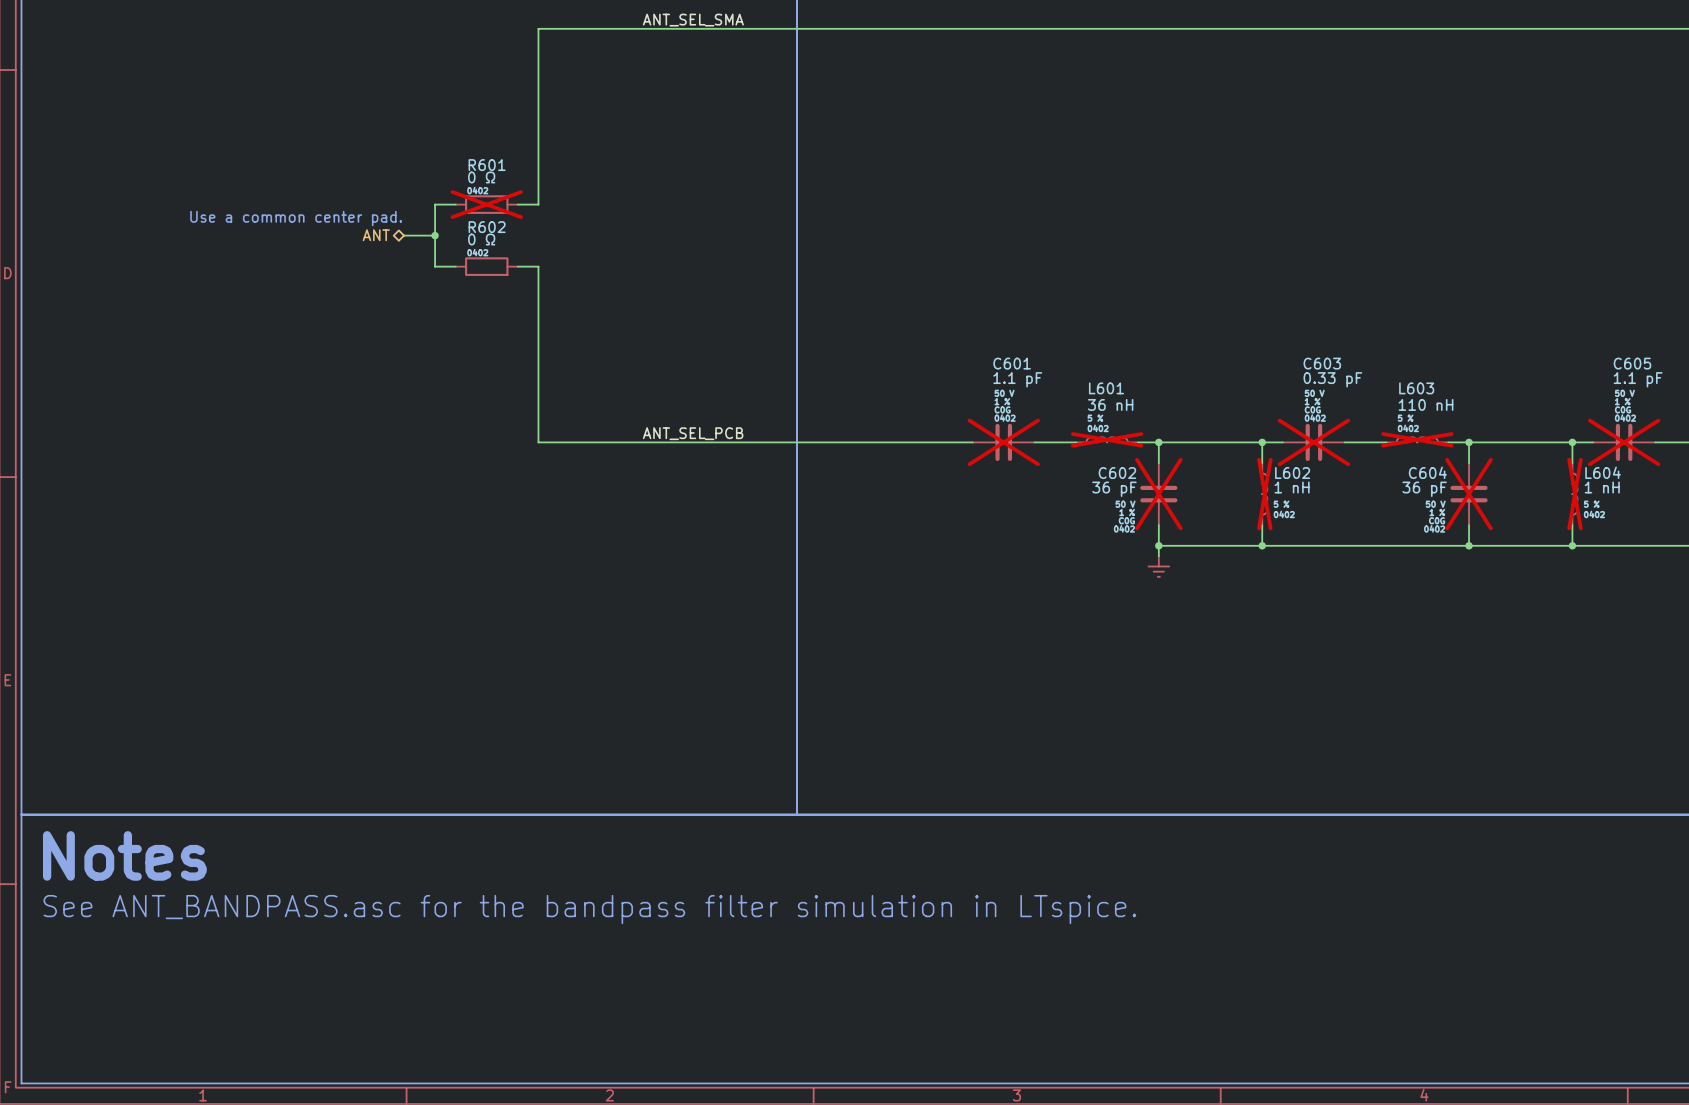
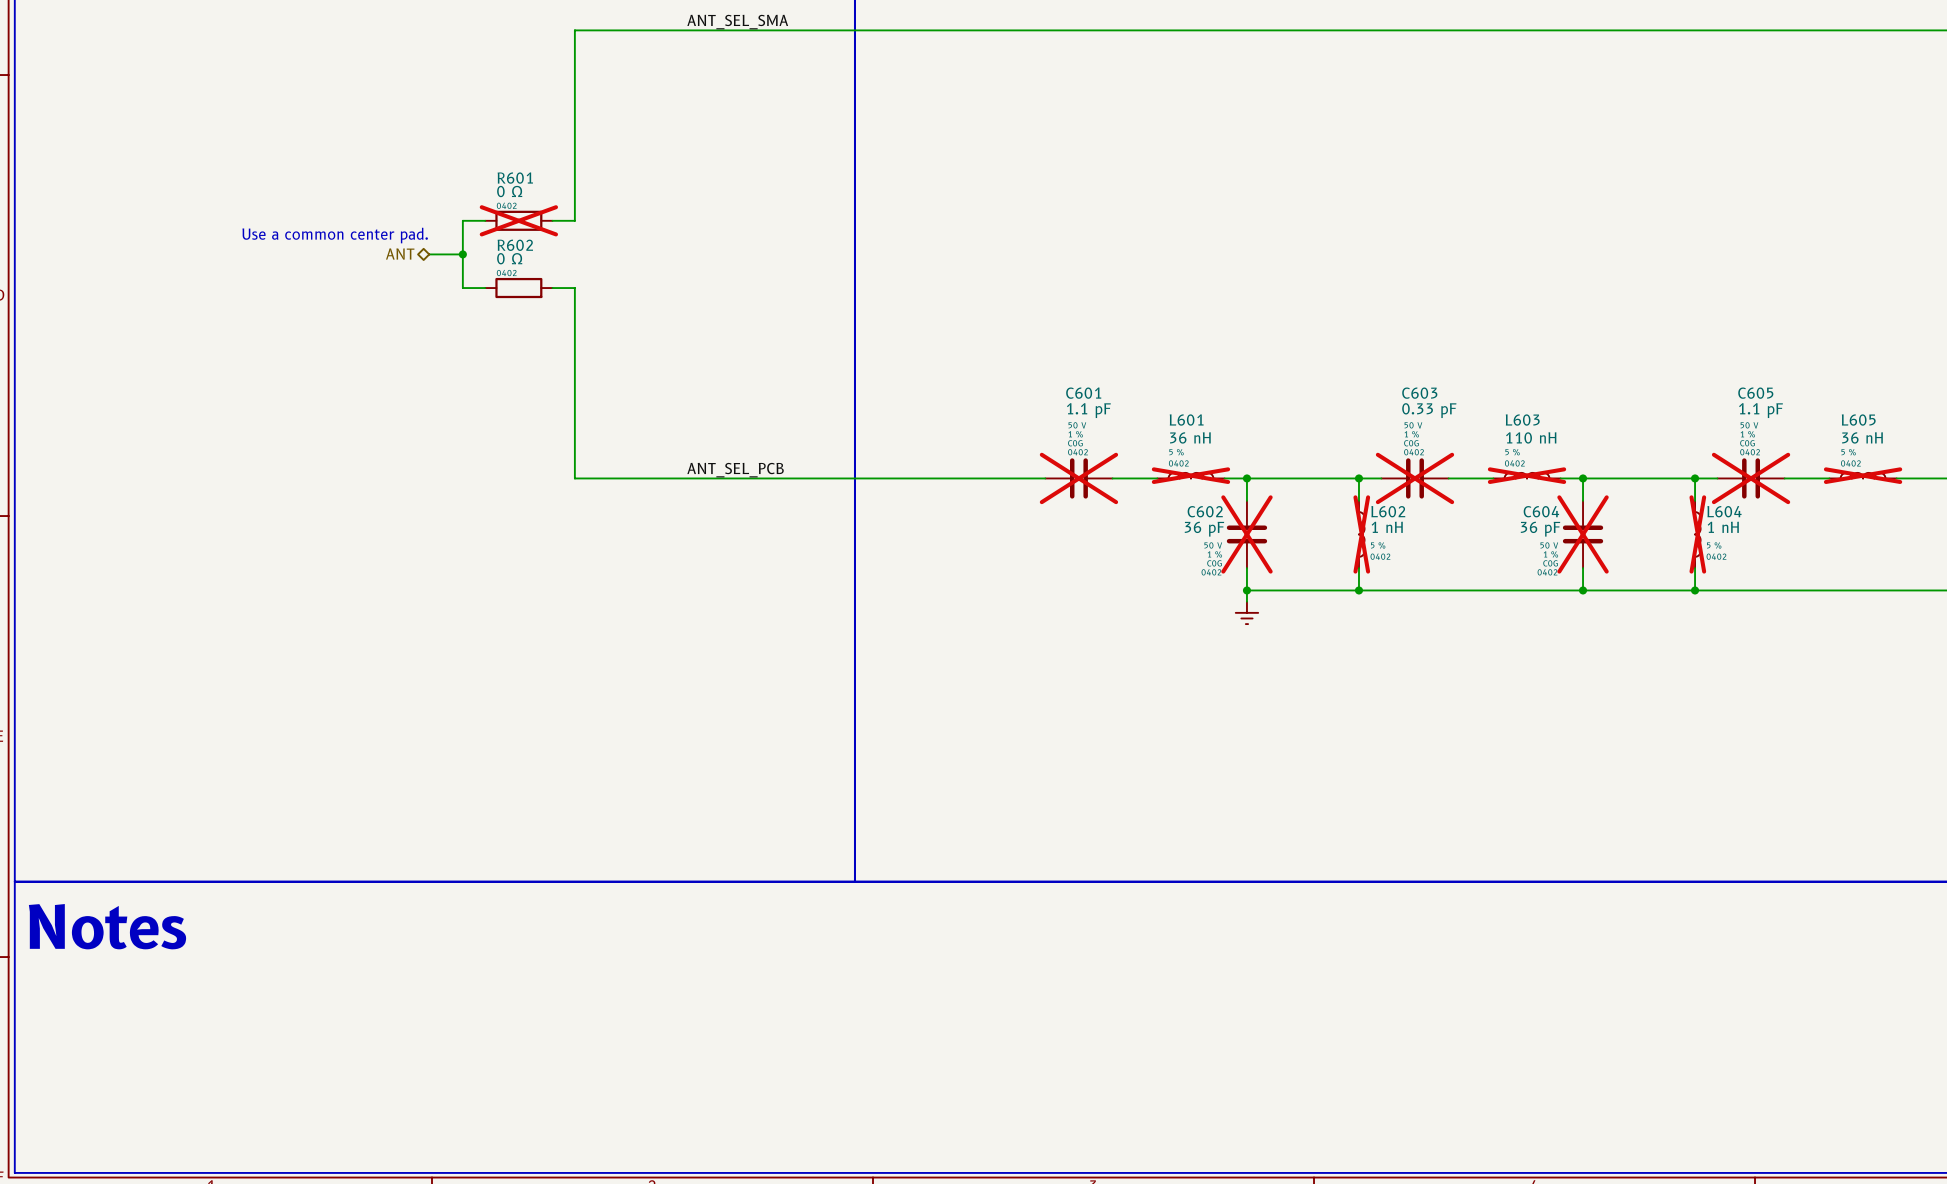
text: See ANT_BANDPASS.asc for the bandpass filter simulation in LTspice. (589, 909) -> none

